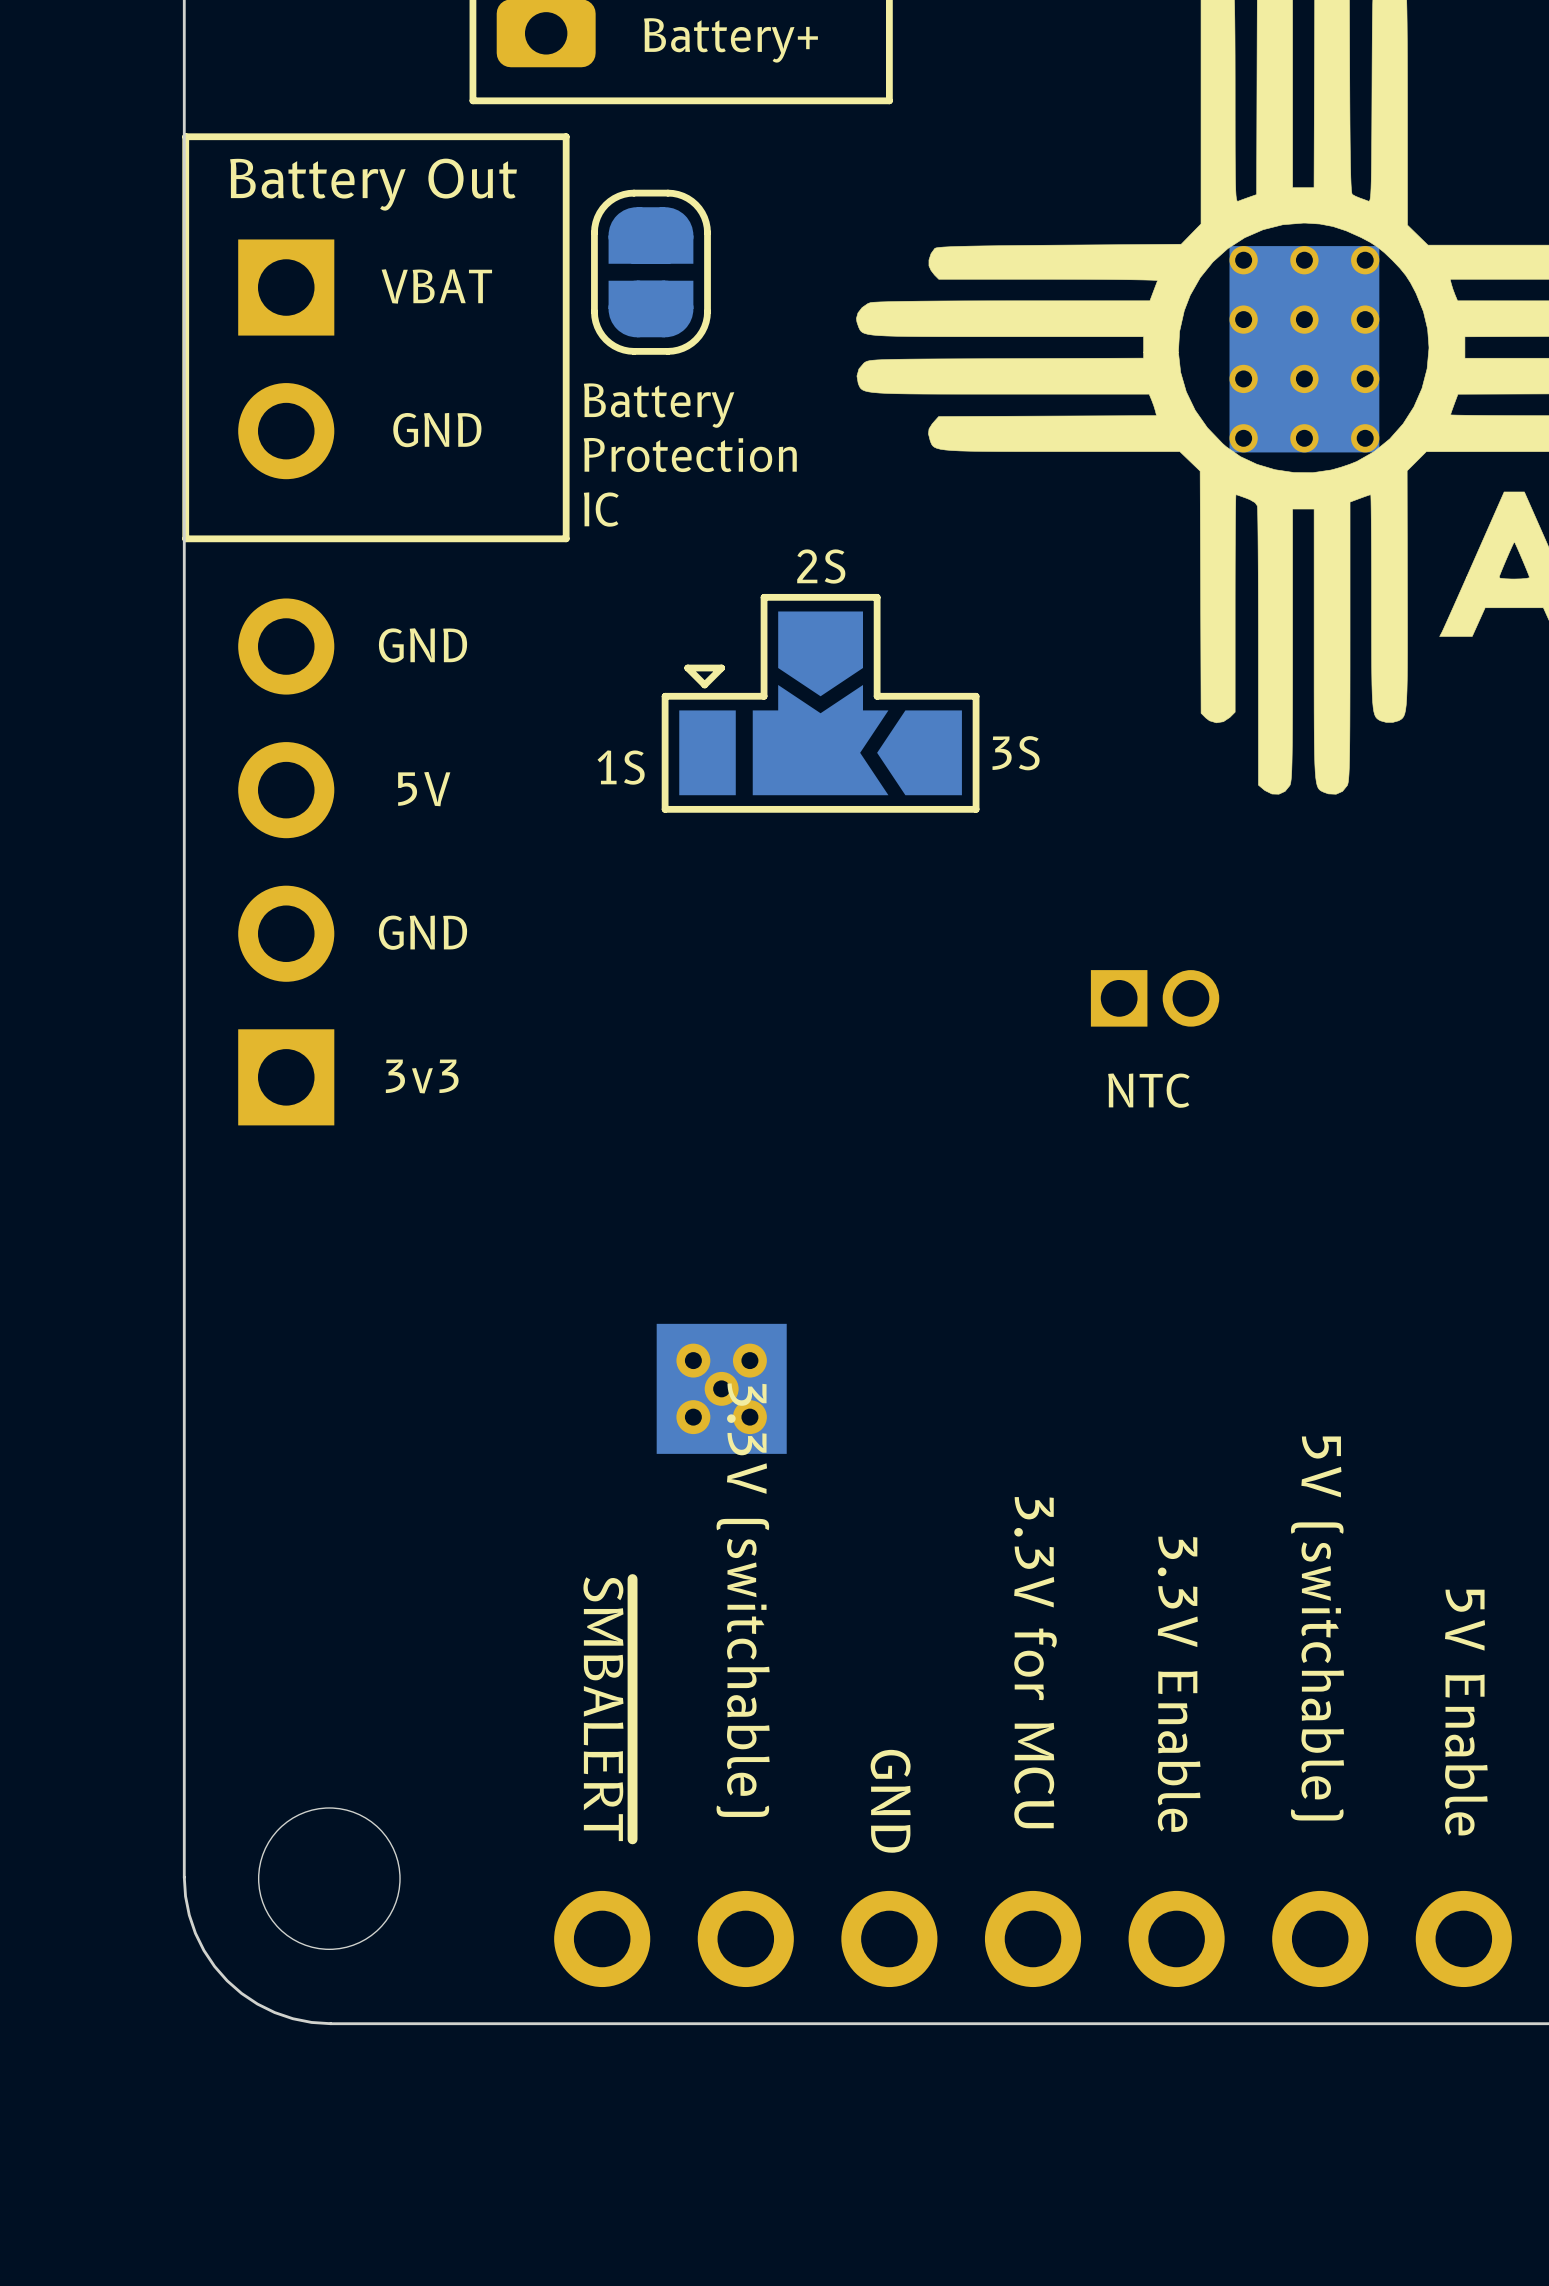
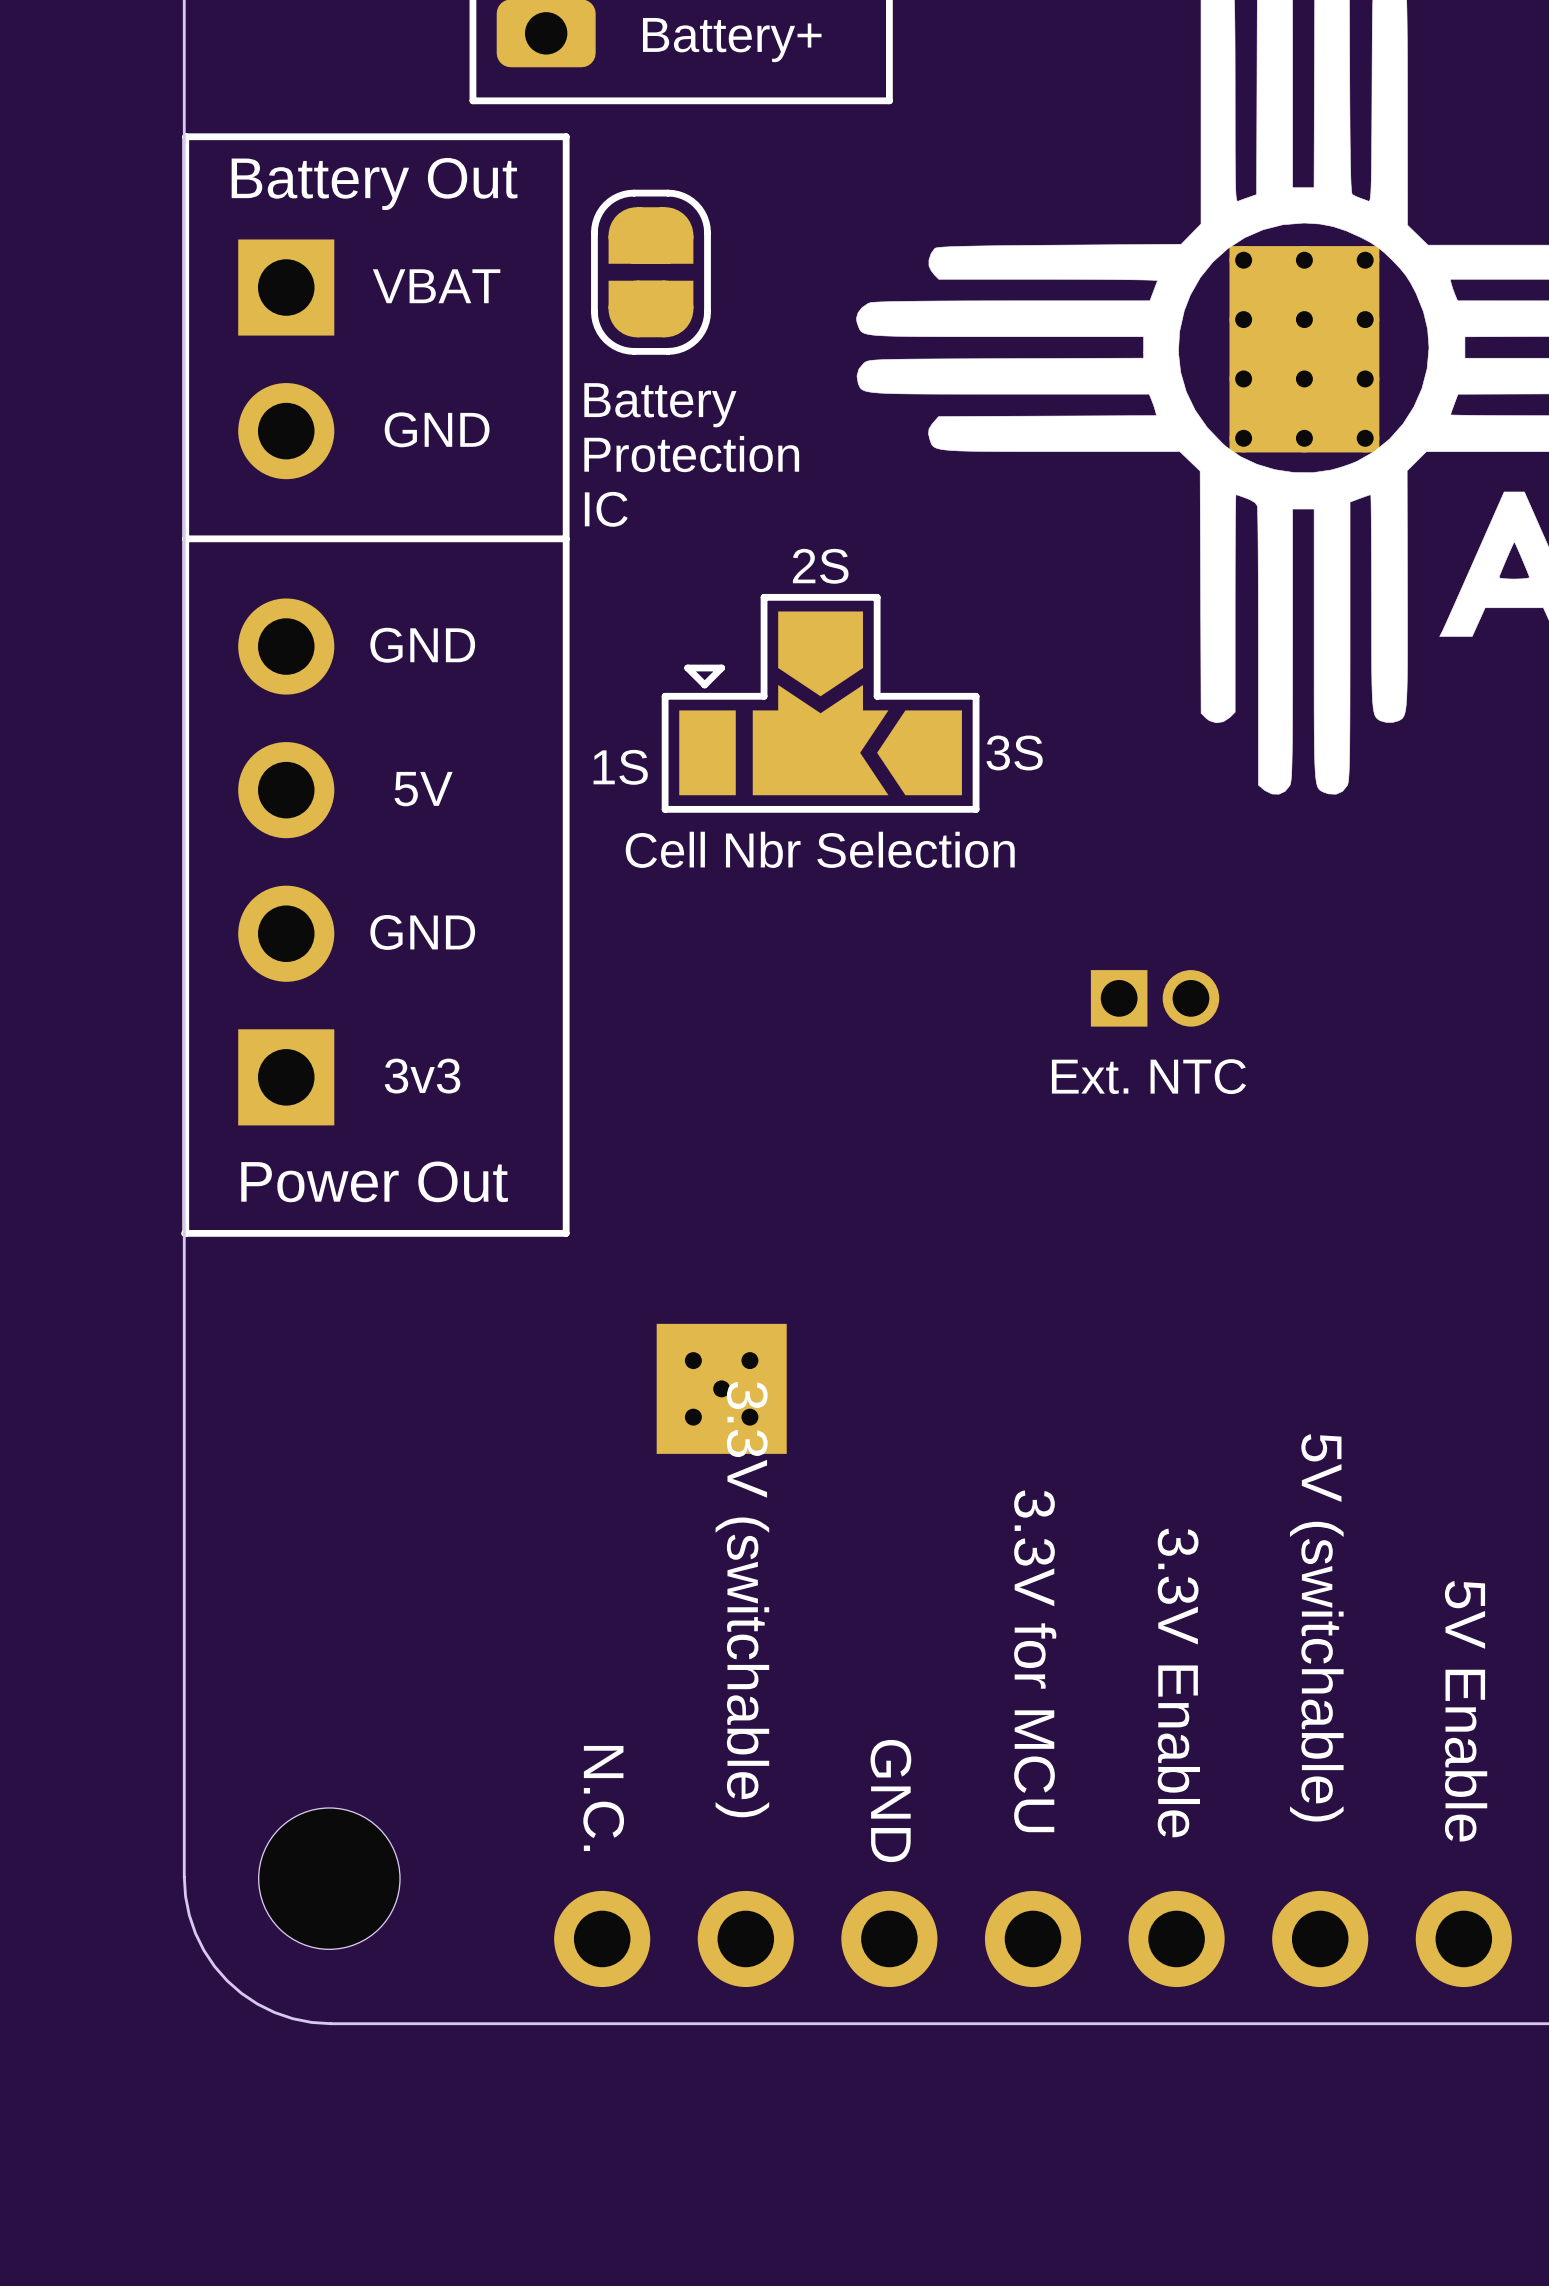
line: none -> (185, 540) (185, 1233)
line: none -> (566, 540) (566, 1233) (184, 1233)
text: none -> Cell Nbr Selection (820, 849)
text: NTC (1148, 1090) -> Ext. NTC (1148, 1076)
text: none -> Power Out (374, 1181)
text: ~{SMBALERT} (607, 1709) -> none
text: none -> N.C. (603, 1798)

